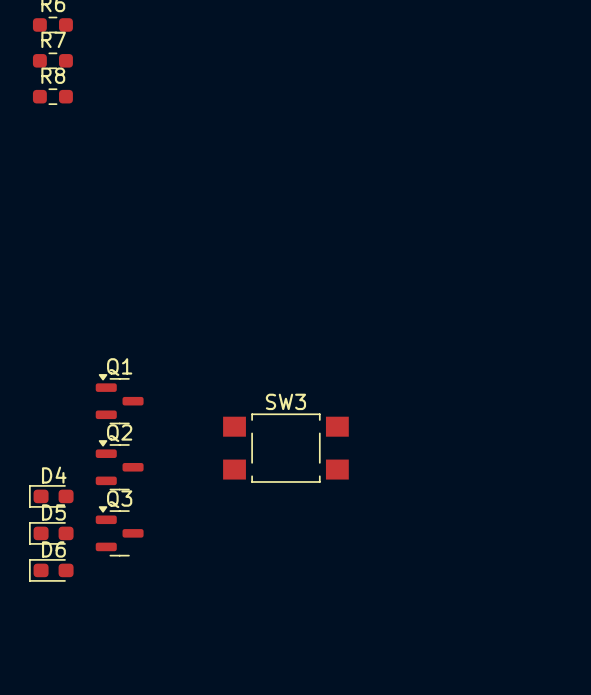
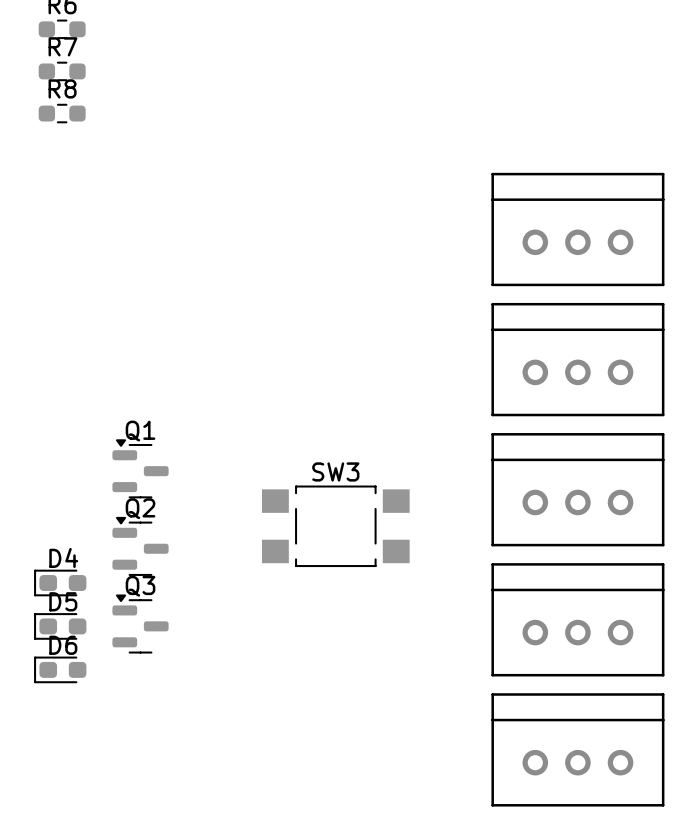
part: none -> (577, 229)
part: none -> (577, 359)
part: none -> (577, 489)
part: none -> (577, 619)
part: none -> (577, 749)

